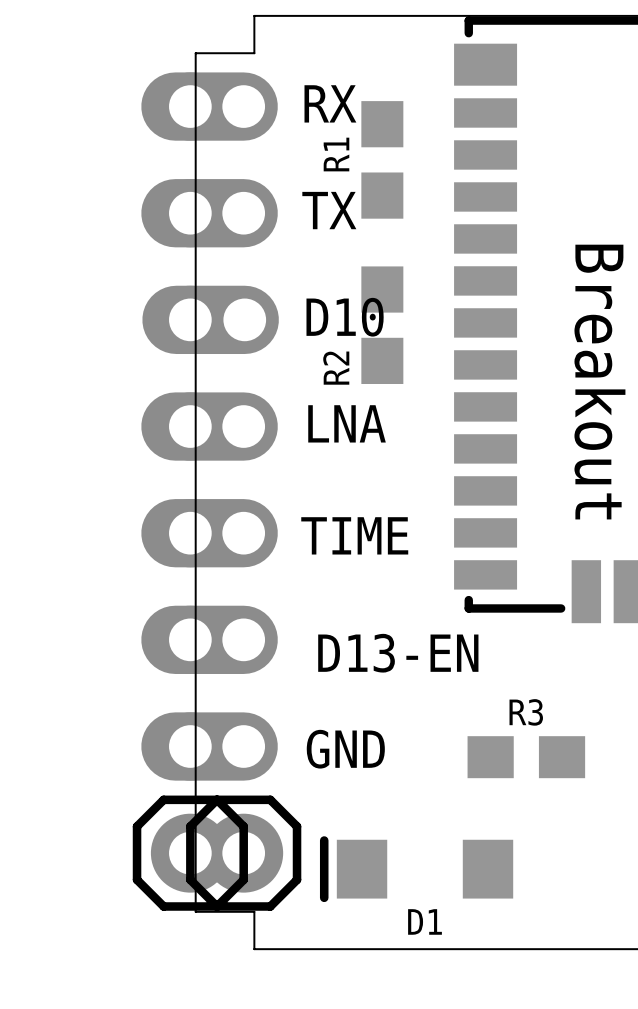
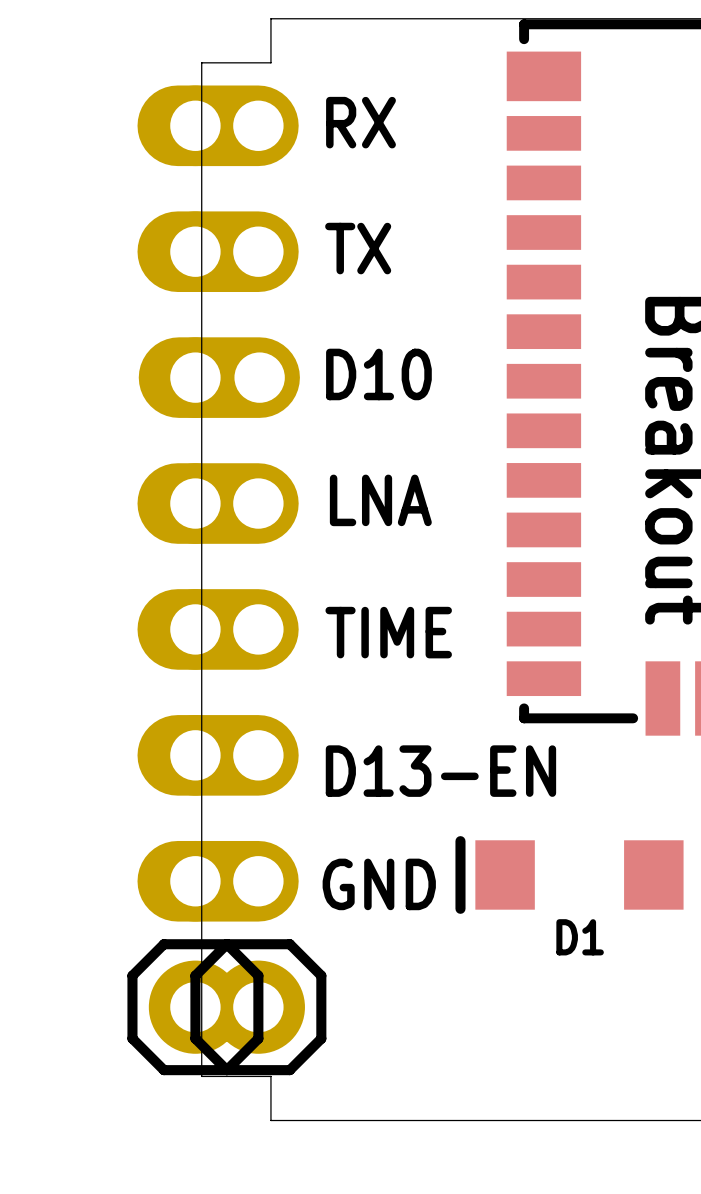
R1: (382, 159) -> none
R2: (382, 325) -> none
R3: (526, 757) -> none
D1 position: (416, 869) -> (569, 874)

